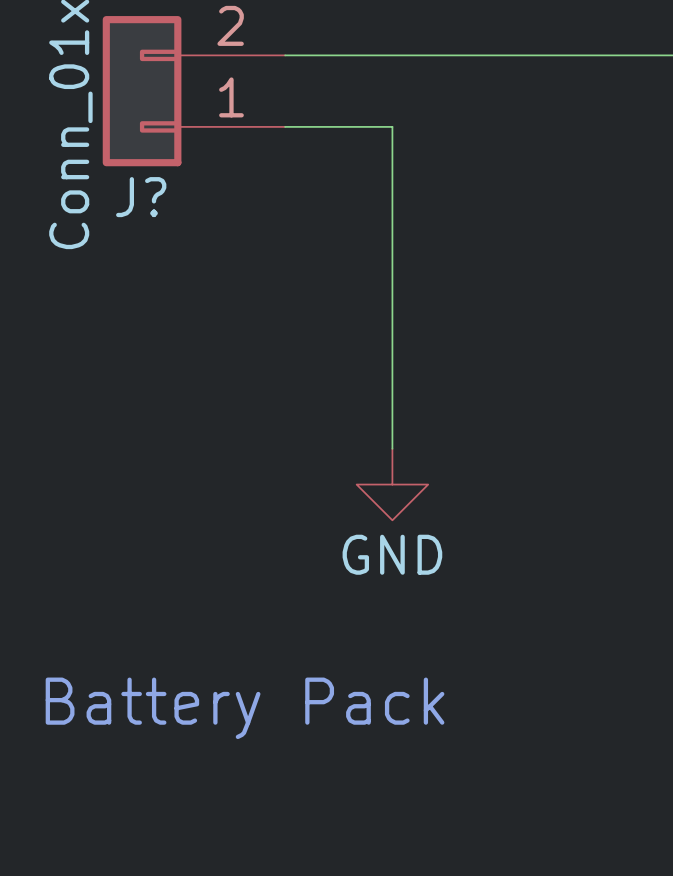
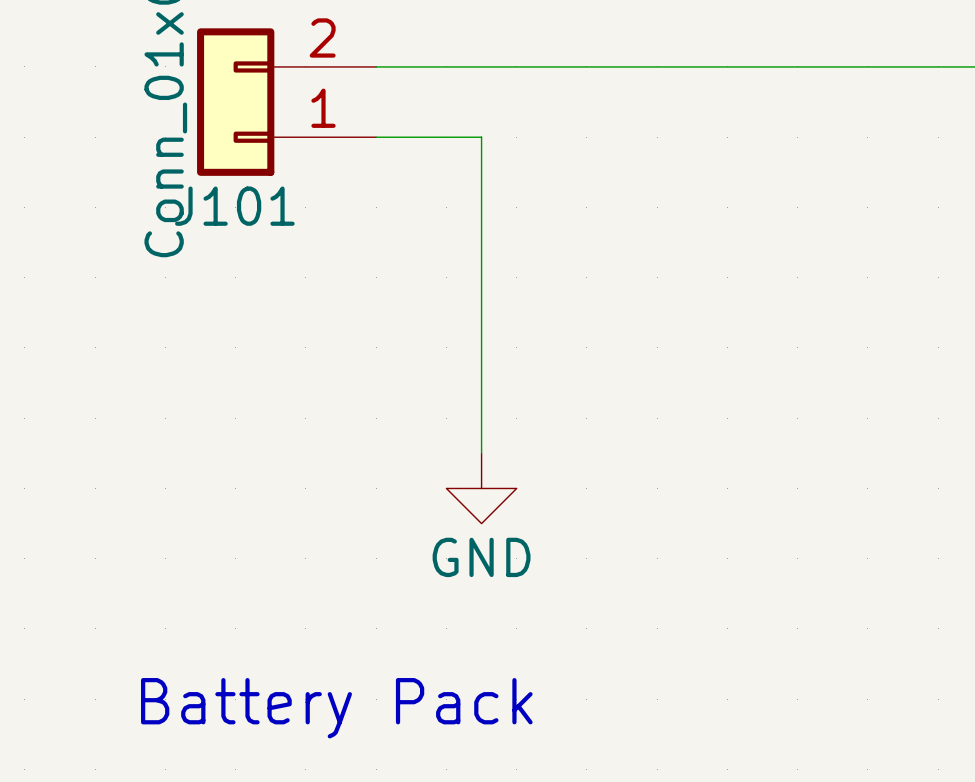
J? name: J? (141, 197) -> J101 (234, 206)

